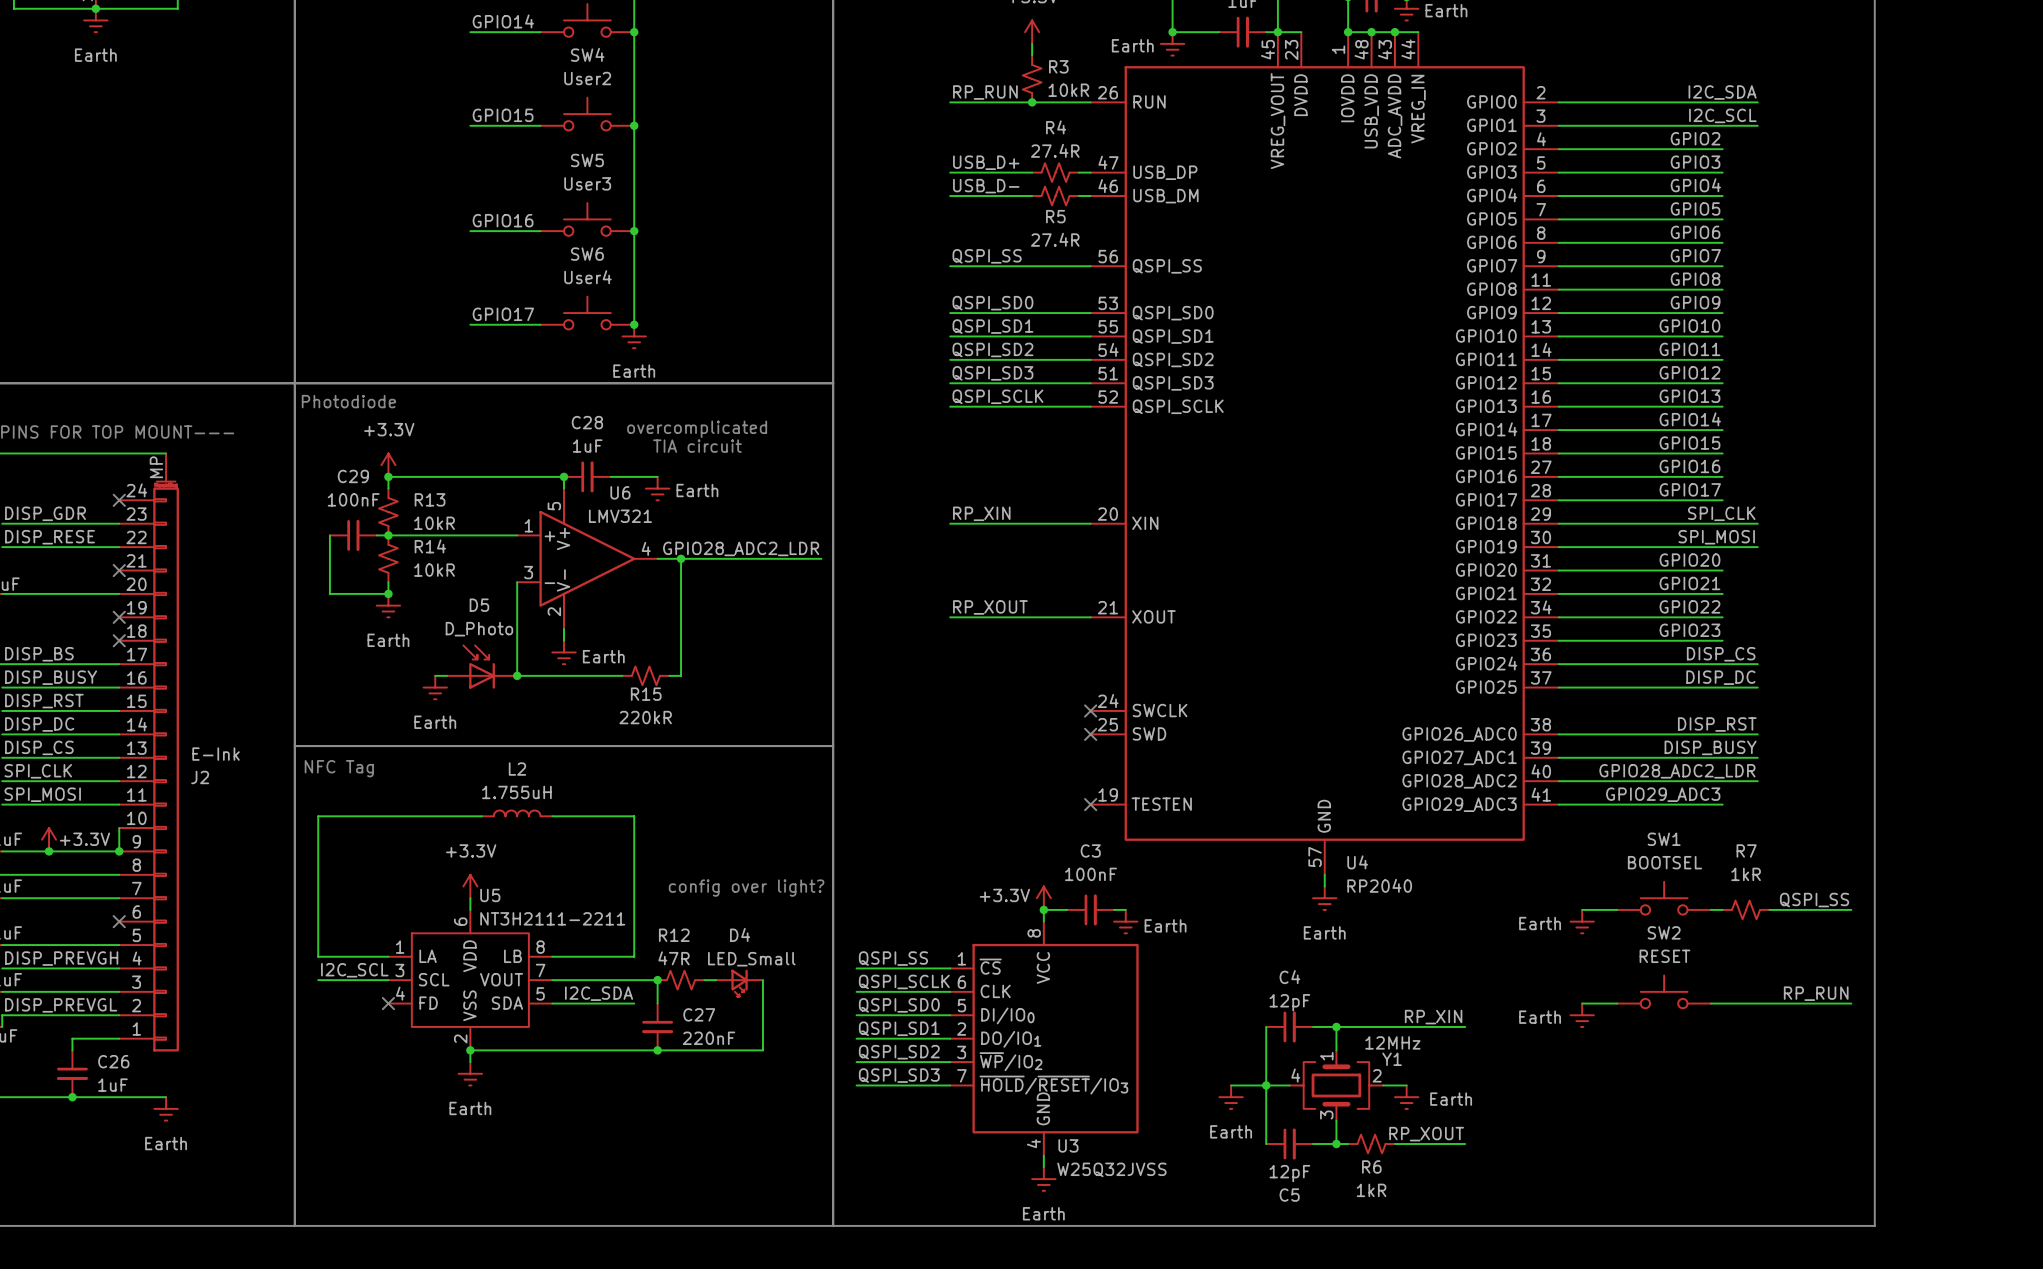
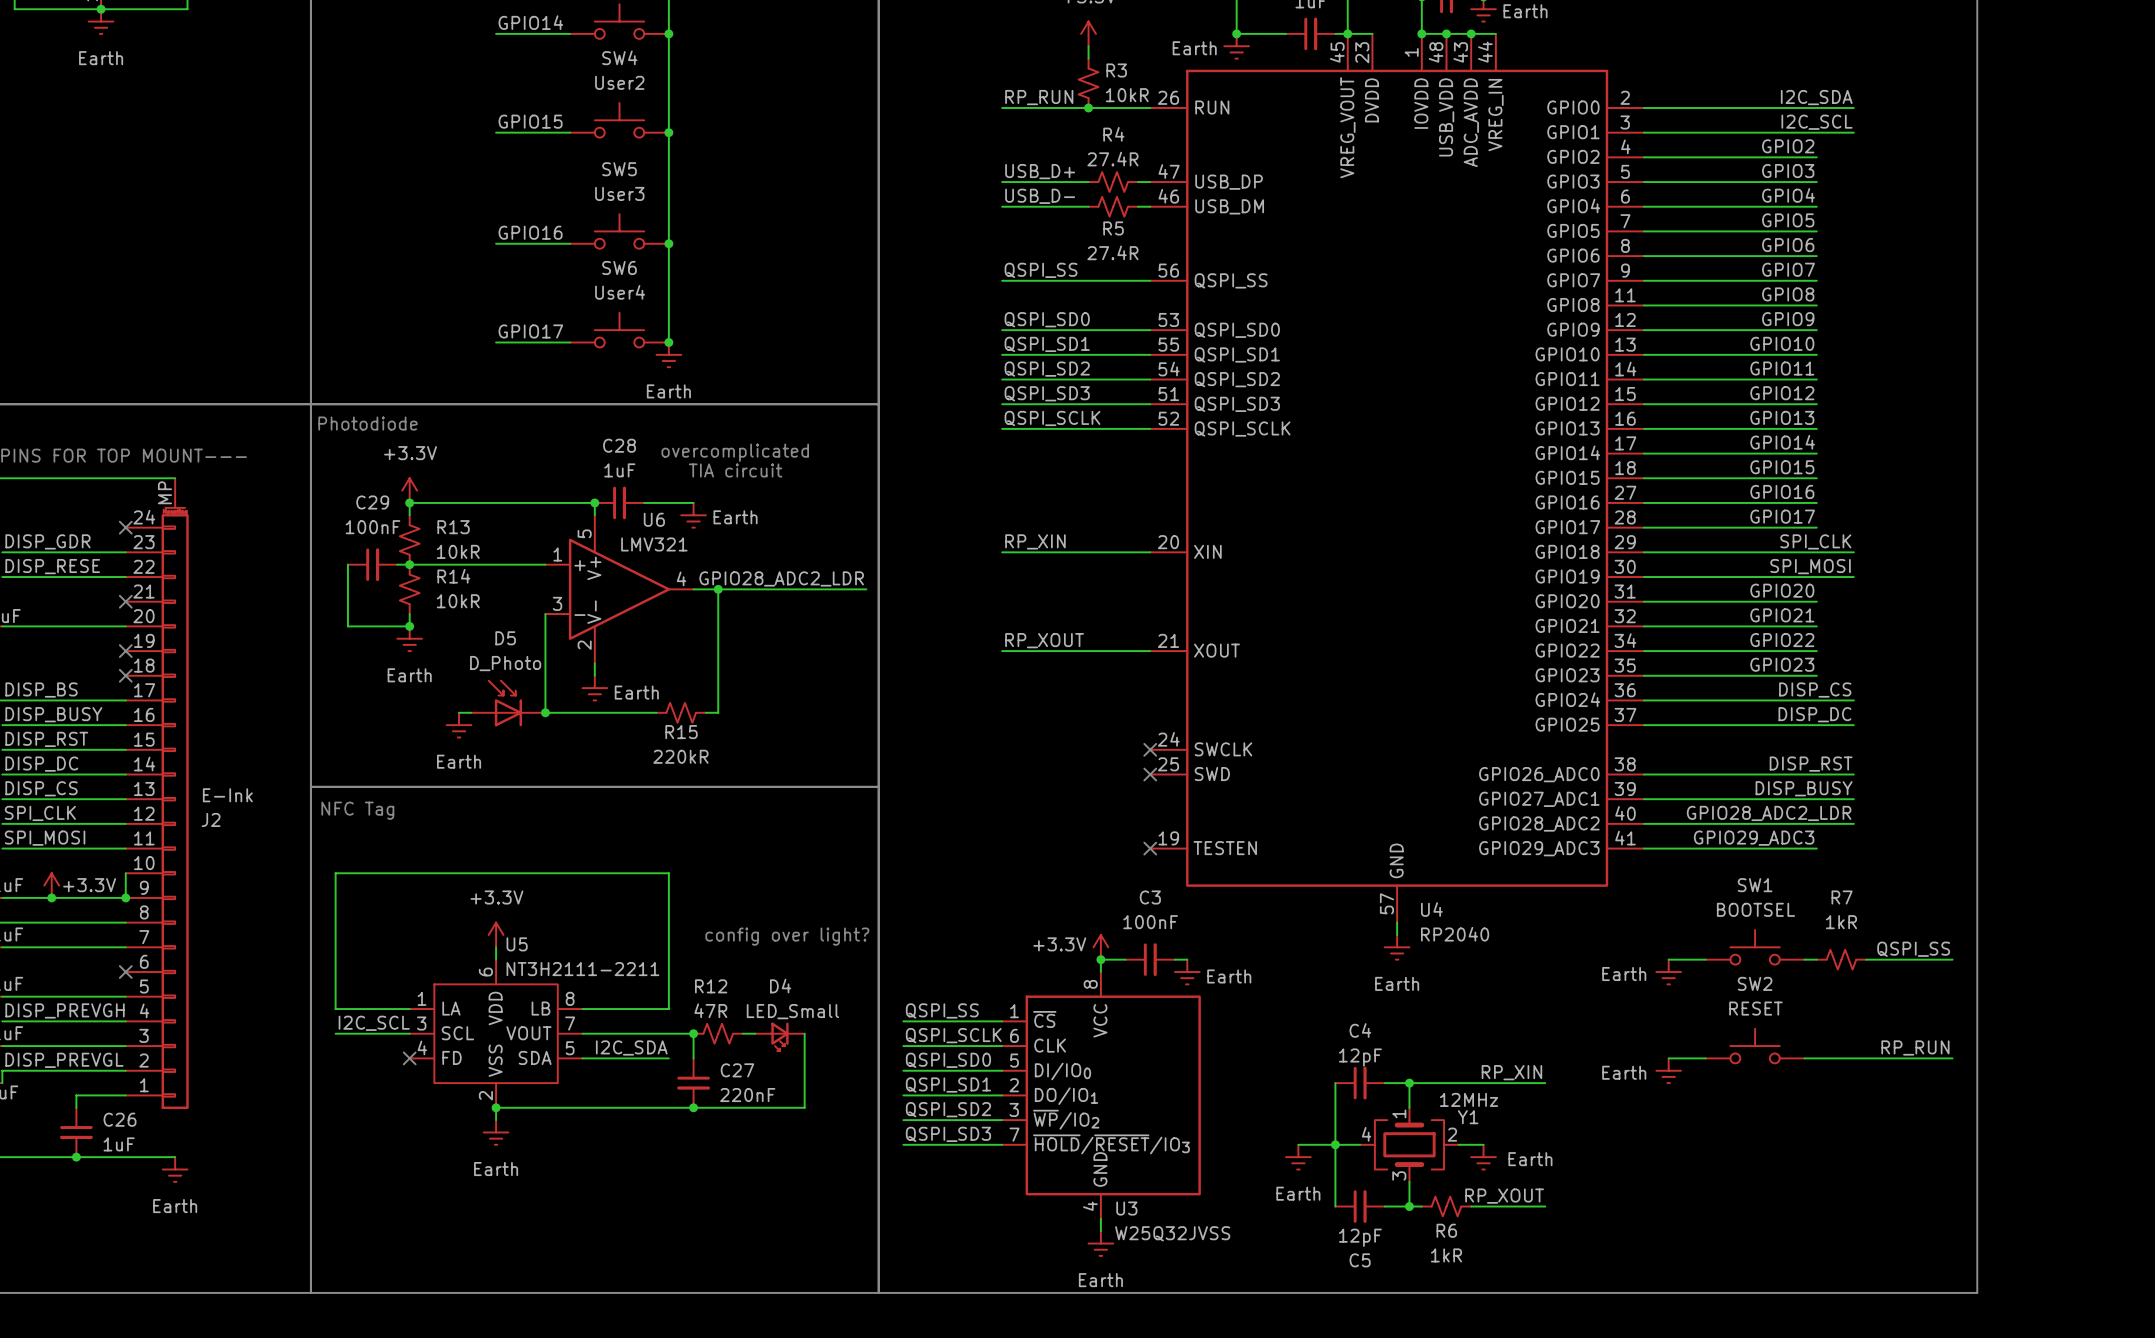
L2: 1.755uH (517, 813) -> none
wire: (482, 816) (318, 816) (318, 828) -> (668, 873) (335, 873)
wire: (552, 816) (634, 816) (634, 828) -> none

